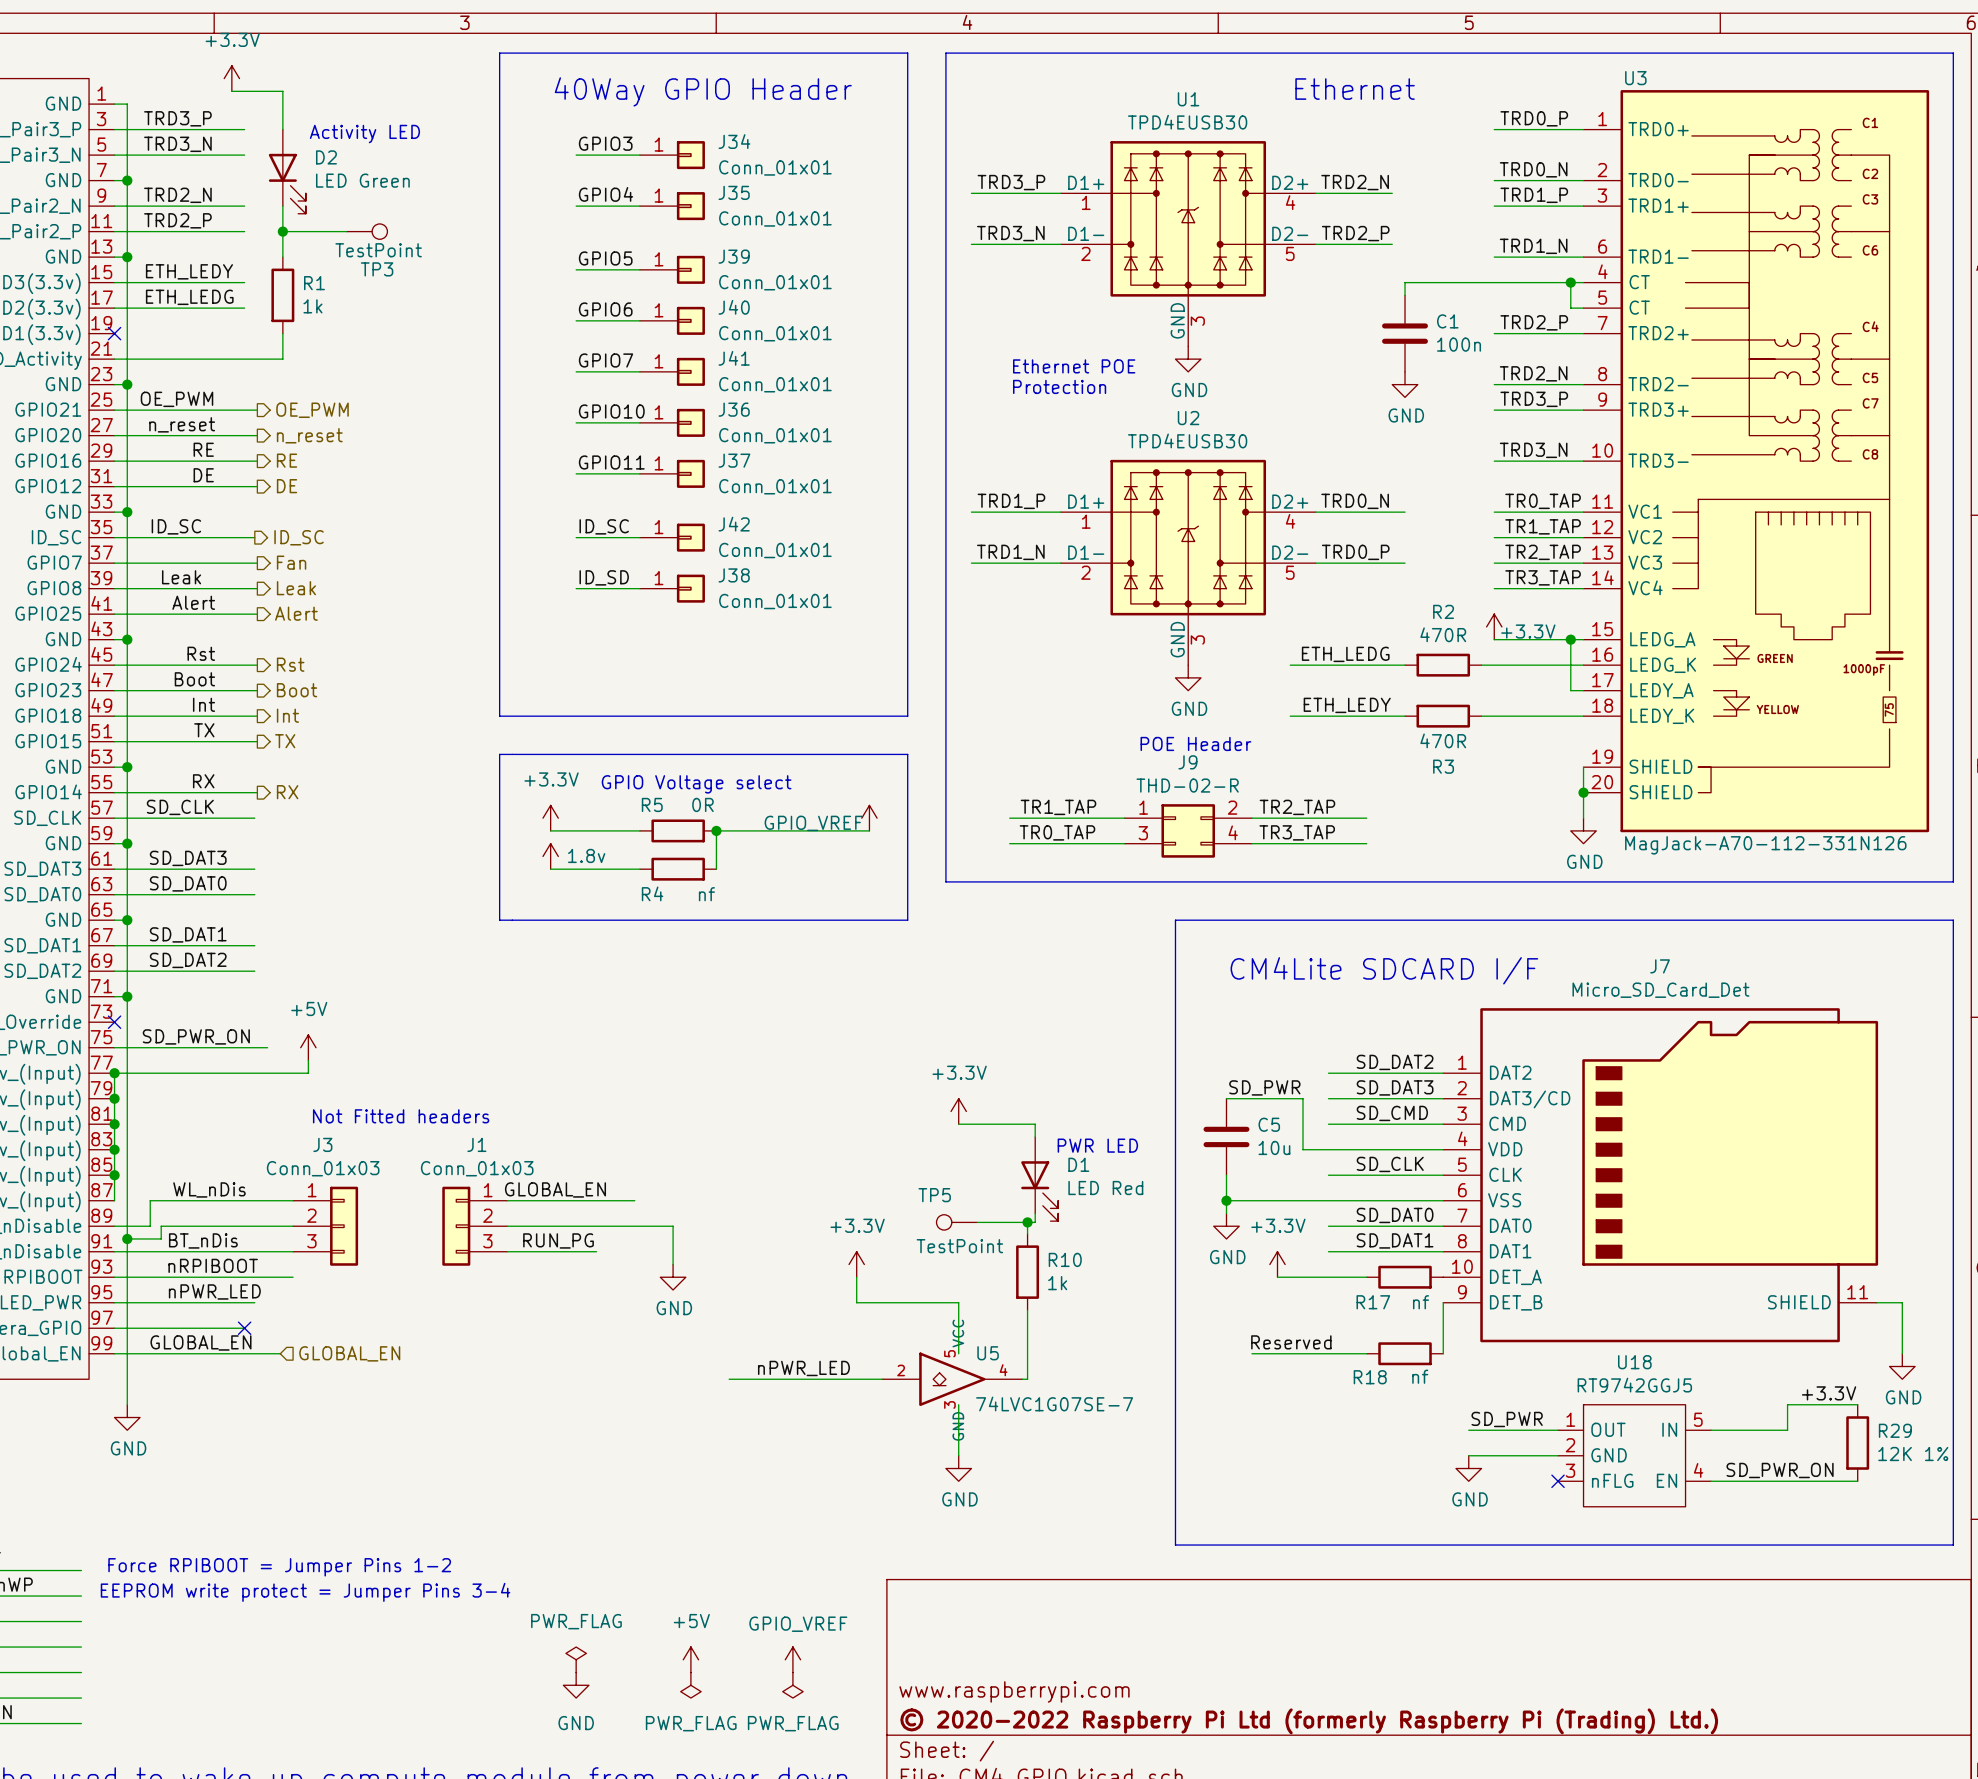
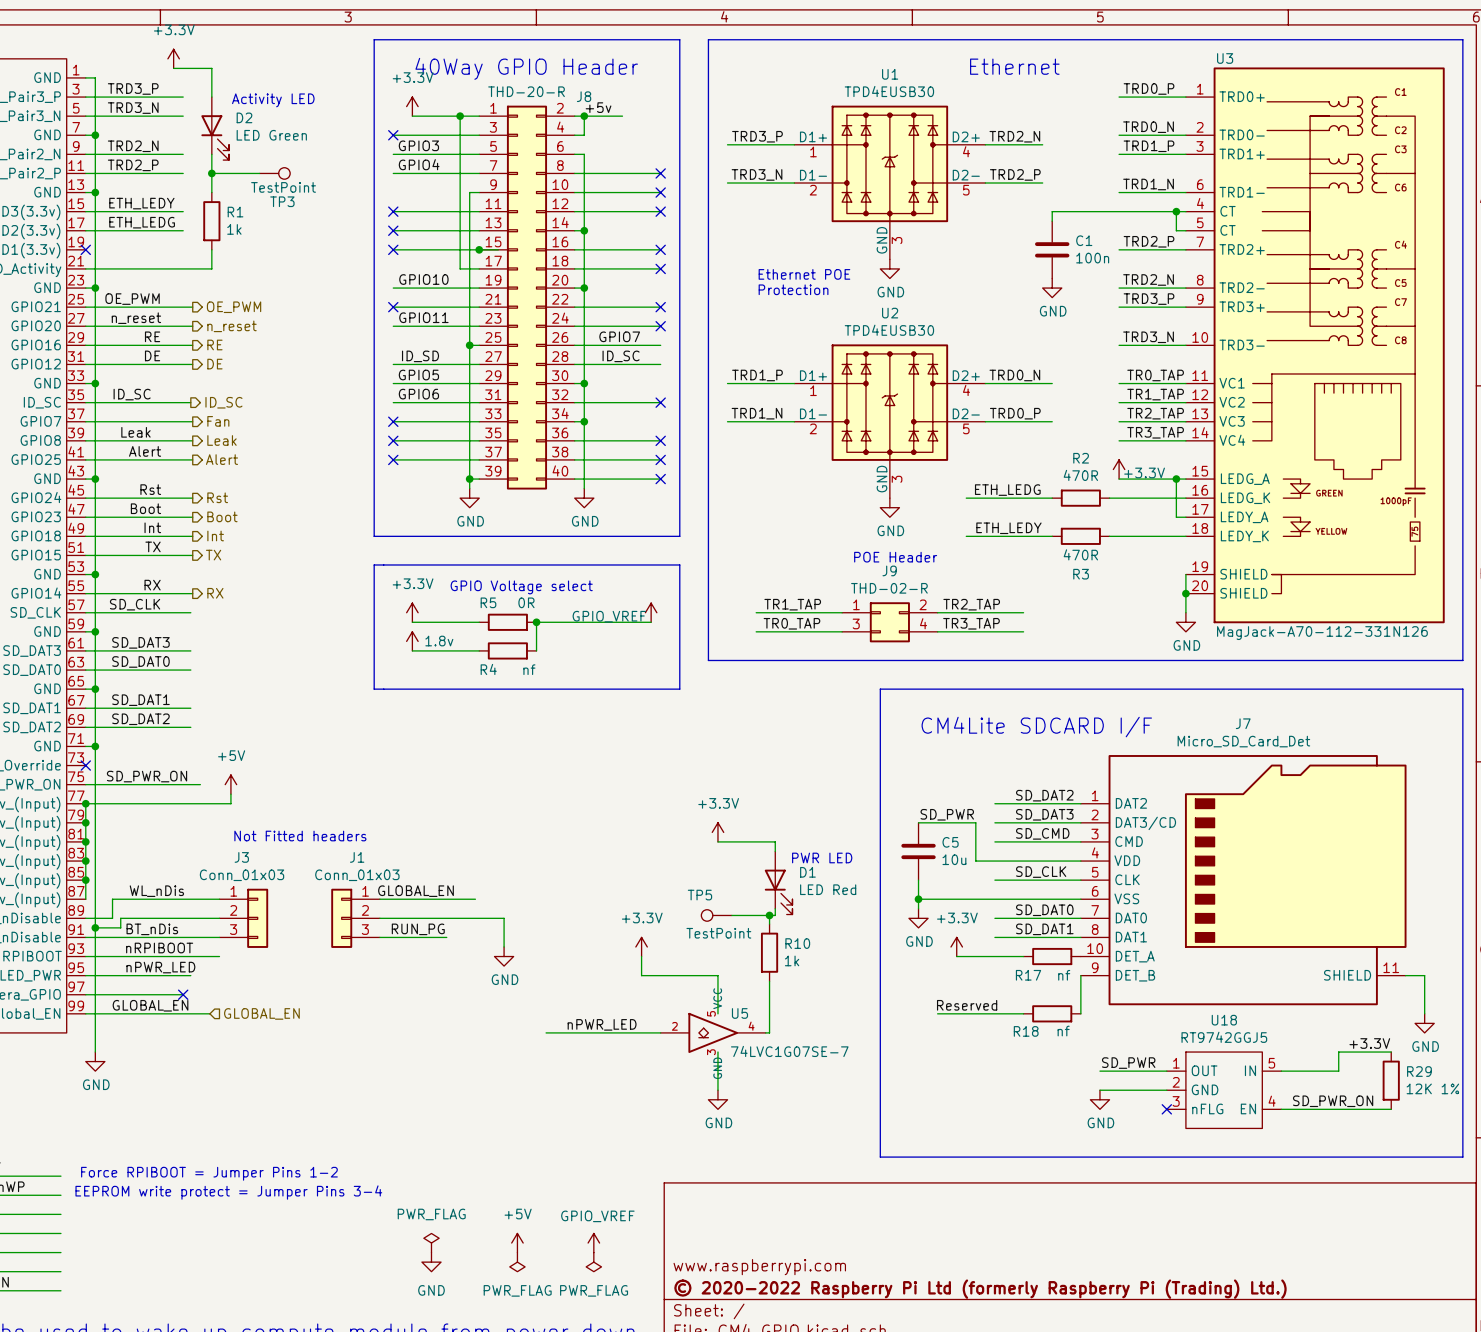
power symbol: none -> +3.3V (412, 106)
label position: GPIO3 (605, 143) -> GPIO3 (418, 145)
label: none -> +5v (598, 107)
wire: none -> (412, 116) (431, 116)
wire: none -> (460, 116) (460, 268) (479, 268)
junction: none -> (460, 116)
J34: Conn_01x01 (672, 155) -> none
wire: none -> (584, 116) (584, 135) (574, 135)
junction: none -> (584, 116)
wire: none -> (393, 135) (479, 135)
no-connect mark: none -> (393, 135)
label position: GPIO4 (606, 194) -> GPIO4 (419, 164)
wire: none -> (393, 154) (431, 154)
J35: Conn_01x01 (672, 206) -> none
wire: none -> (574, 154) (584, 154) (584, 488)
wire: none -> (393, 173) (479, 173)
wire: none -> (574, 173) (660, 173)
no-connect mark: none -> (660, 173)
wire: none -> (479, 192) (469, 192) (469, 488)
wire: none -> (574, 192) (660, 192)
no-connect mark: none -> (660, 192)
label position: GPIO5 (605, 258) -> GPIO5 (418, 375)
wire: (576, 269) (639, 269) -> (574, 116) (622, 116)
J39: Conn_01x01 (672, 269) -> none
wire: none -> (393, 211) (479, 211)
no-connect mark: none -> (393, 211)
wire: none -> (574, 211) (660, 211)
no-connect mark: none -> (660, 211)
wire: none -> (393, 230) (479, 230)
no-connect mark: none -> (393, 230)
wire: none -> (574, 230) (584, 230)
junction: none -> (584, 230)
label position: GPIO6 (605, 309) -> GPIO6 (418, 394)
wire: (576, 320) (639, 320) -> none
J40: Conn_01x01 (672, 320) -> none
wire: none -> (393, 249) (498, 249)
no-connect mark: none -> (393, 249)
junction: none -> (479, 249)
wire: none -> (574, 249) (660, 249)
no-connect mark: none -> (660, 249)
wire: none -> (574, 268) (660, 268)
no-connect mark: none -> (660, 268)
label: GPIO7 (606, 360) -> none
wire: (576, 371) (639, 371) -> none
J41: Conn_01x01 (672, 371) -> none
wire: none -> (393, 288) (479, 288)
wire: none -> (574, 288) (584, 288)
junction: none -> (584, 288)
J8: none -> THD-20-R (526, 297)
wire: none -> (393, 307) (479, 307)
no-connect mark: none -> (393, 307)
wire: none -> (574, 307) (660, 307)
no-connect mark: none -> (660, 307)
label position: GPIO10 (611, 411) -> GPIO10 (423, 279)
wire: (576, 422) (639, 422) -> none
J36: Conn_01x01 (672, 422) -> none
wire: none -> (393, 326) (479, 326)
wire: none -> (574, 326) (660, 326)
no-connect mark: none -> (660, 326)
label: none -> GPIO7 (619, 336)
wire: none -> (469, 345) (479, 345)
junction: none -> (469, 345)
wire: none -> (574, 345) (660, 345)
label position: GPIO11 (611, 462) -> GPIO11 (423, 317)
wire: (576, 473) (639, 473) -> none
J37: Conn_01x01 (672, 473) -> none
label: none -> ID_SC (621, 356)
wire: none -> (393, 364) (479, 364)
wire: none -> (574, 364) (660, 364)
wire: none -> (393, 383) (479, 383)
wire: none -> (574, 383) (584, 383)
junction: none -> (584, 383)
label: ID_SC (604, 526) -> none
wire: none -> (393, 402) (431, 402)
J42: Conn_01x01 (672, 537) -> none
wire: none -> (574, 402) (660, 402)
no-connect mark: none -> (660, 402)
wire: none -> (393, 421) (479, 421)
no-connect mark: none -> (393, 421)
wire: none -> (574, 421) (584, 421)
junction: none -> (584, 421)
label position: ID_SD (604, 577) -> ID_SD (420, 356)
wire: none -> (393, 440) (431, 440)
no-connect mark: none -> (393, 440)
J38: Conn_01x01 (672, 588) -> none
wire: none -> (574, 440) (660, 440)
no-connect mark: none -> (660, 440)
wire: none -> (393, 459) (479, 459)
no-connect mark: none -> (393, 459)
wire: none -> (574, 459) (660, 459)
no-connect mark: none -> (660, 459)
wire: none -> (469, 479) (479, 479)
junction: none -> (469, 479)
wire: none -> (574, 479) (660, 479)
no-connect mark: none -> (660, 479)
power symbol: none -> GND (469, 498)
power symbol: none -> GND (584, 498)

